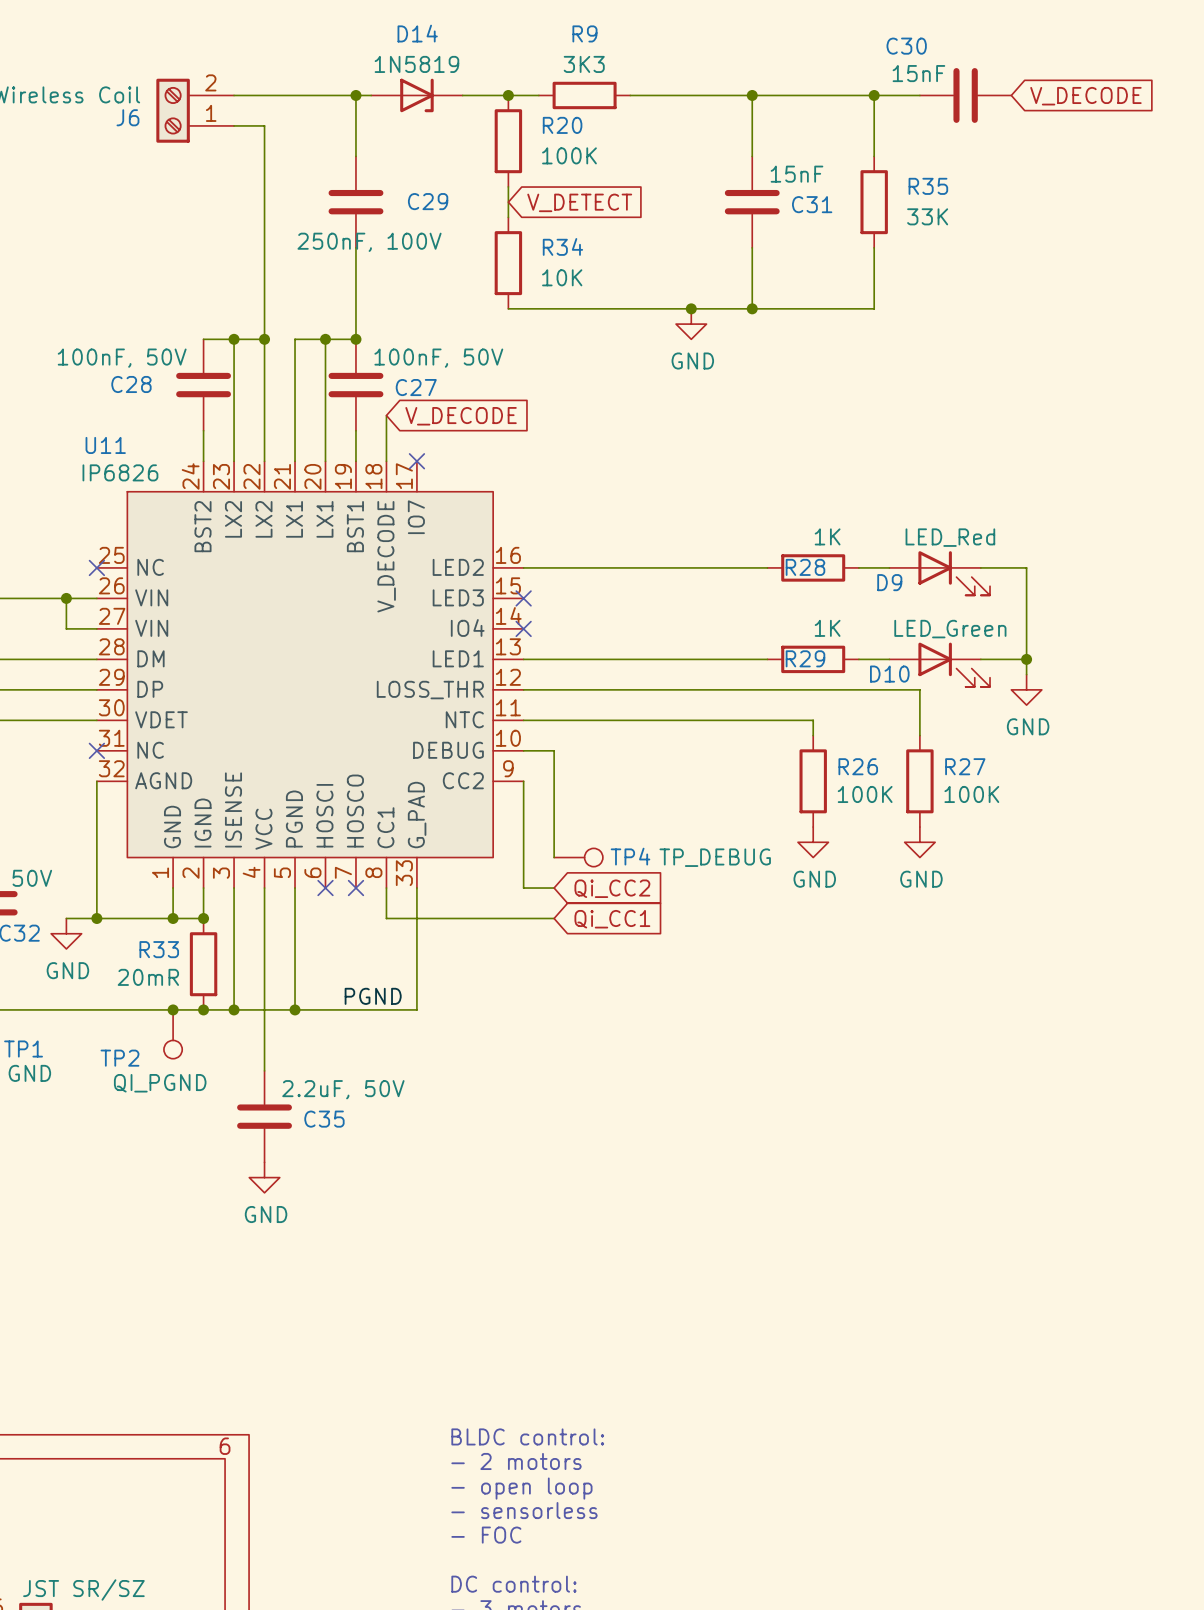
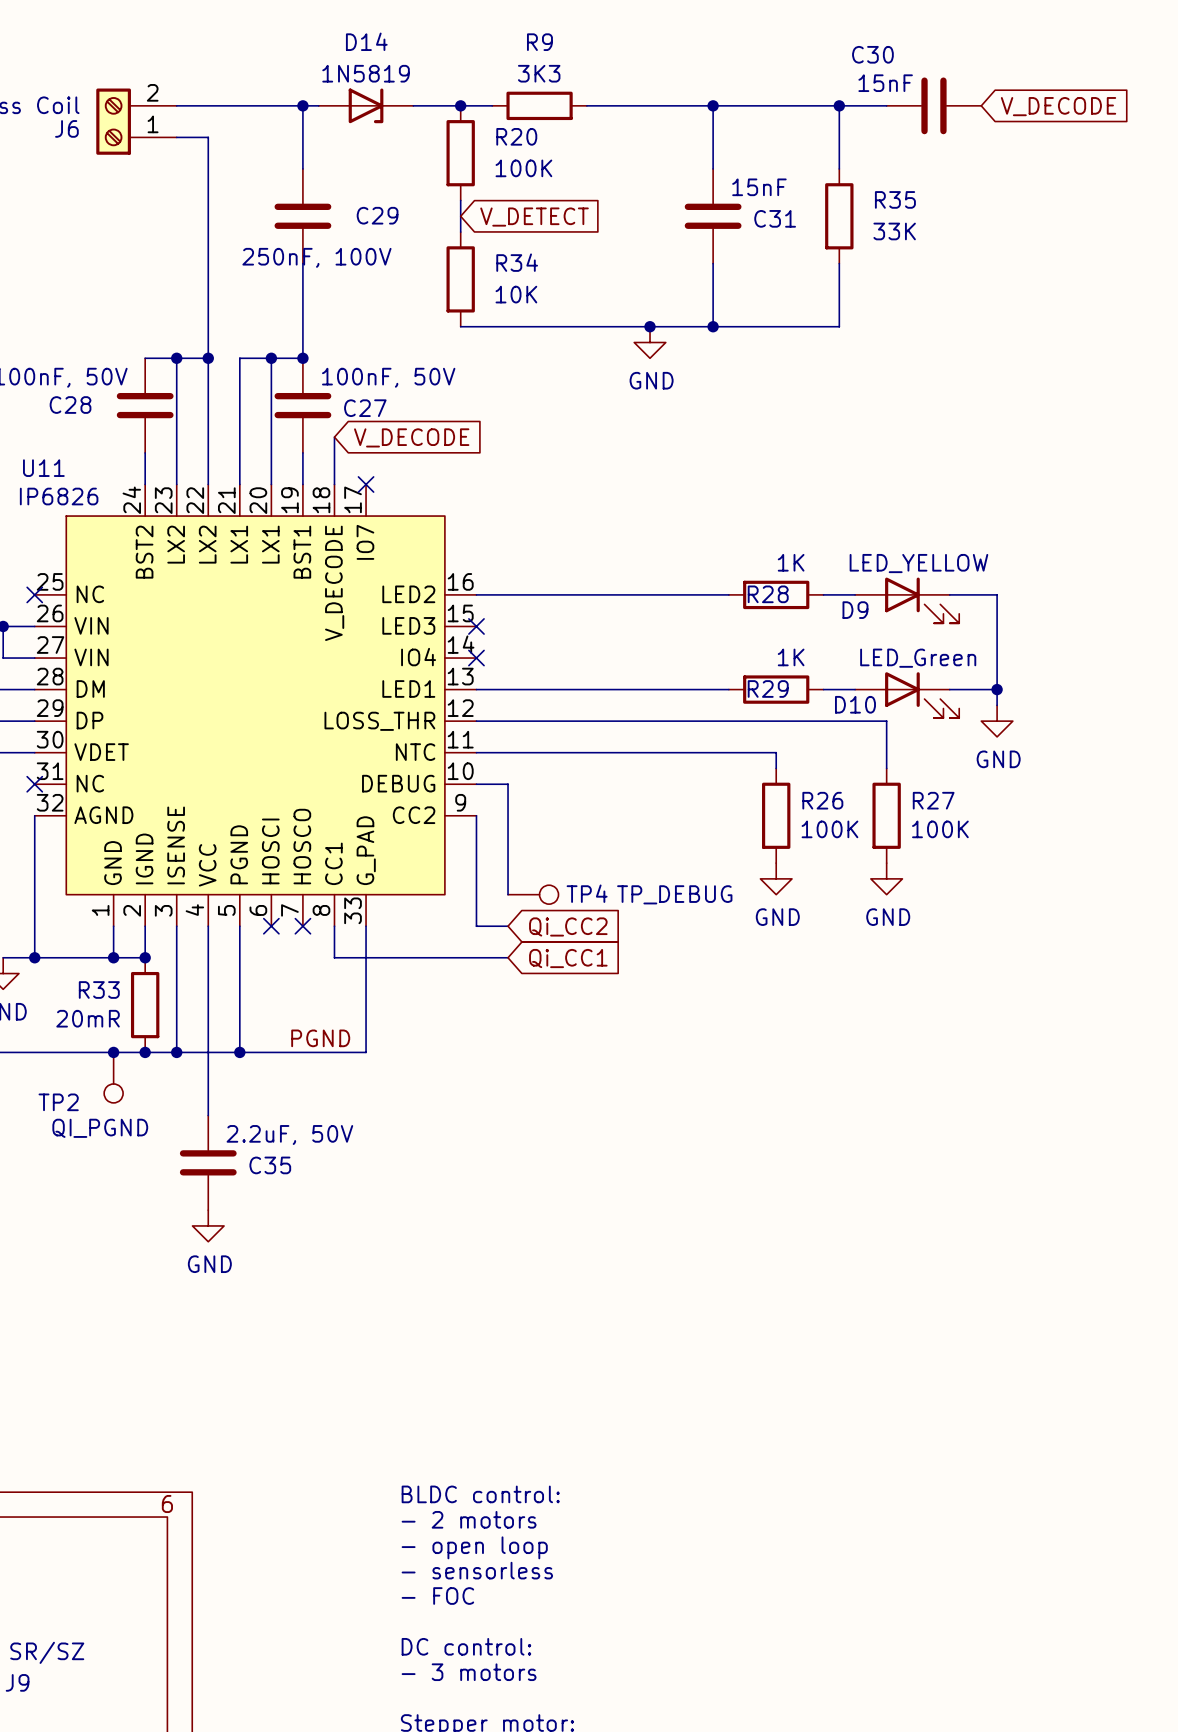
D9 value: LED_Red (950, 537) -> LED_YELLOW (918, 563)

